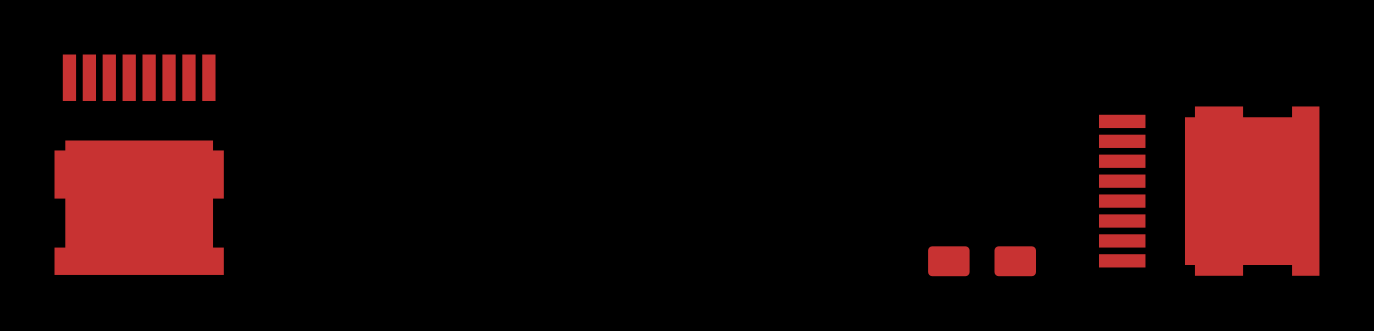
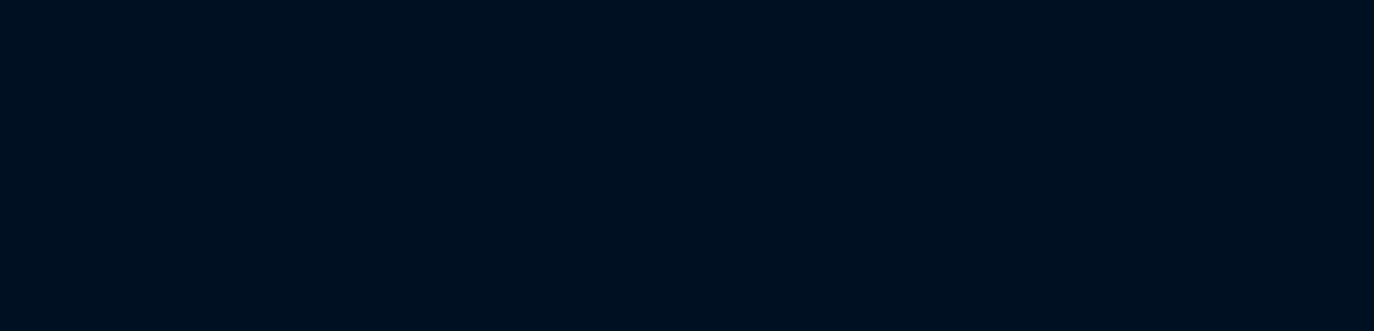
part: (139, 164) -> none
part: (1209, 191) -> none
part: (982, 261) -> none

